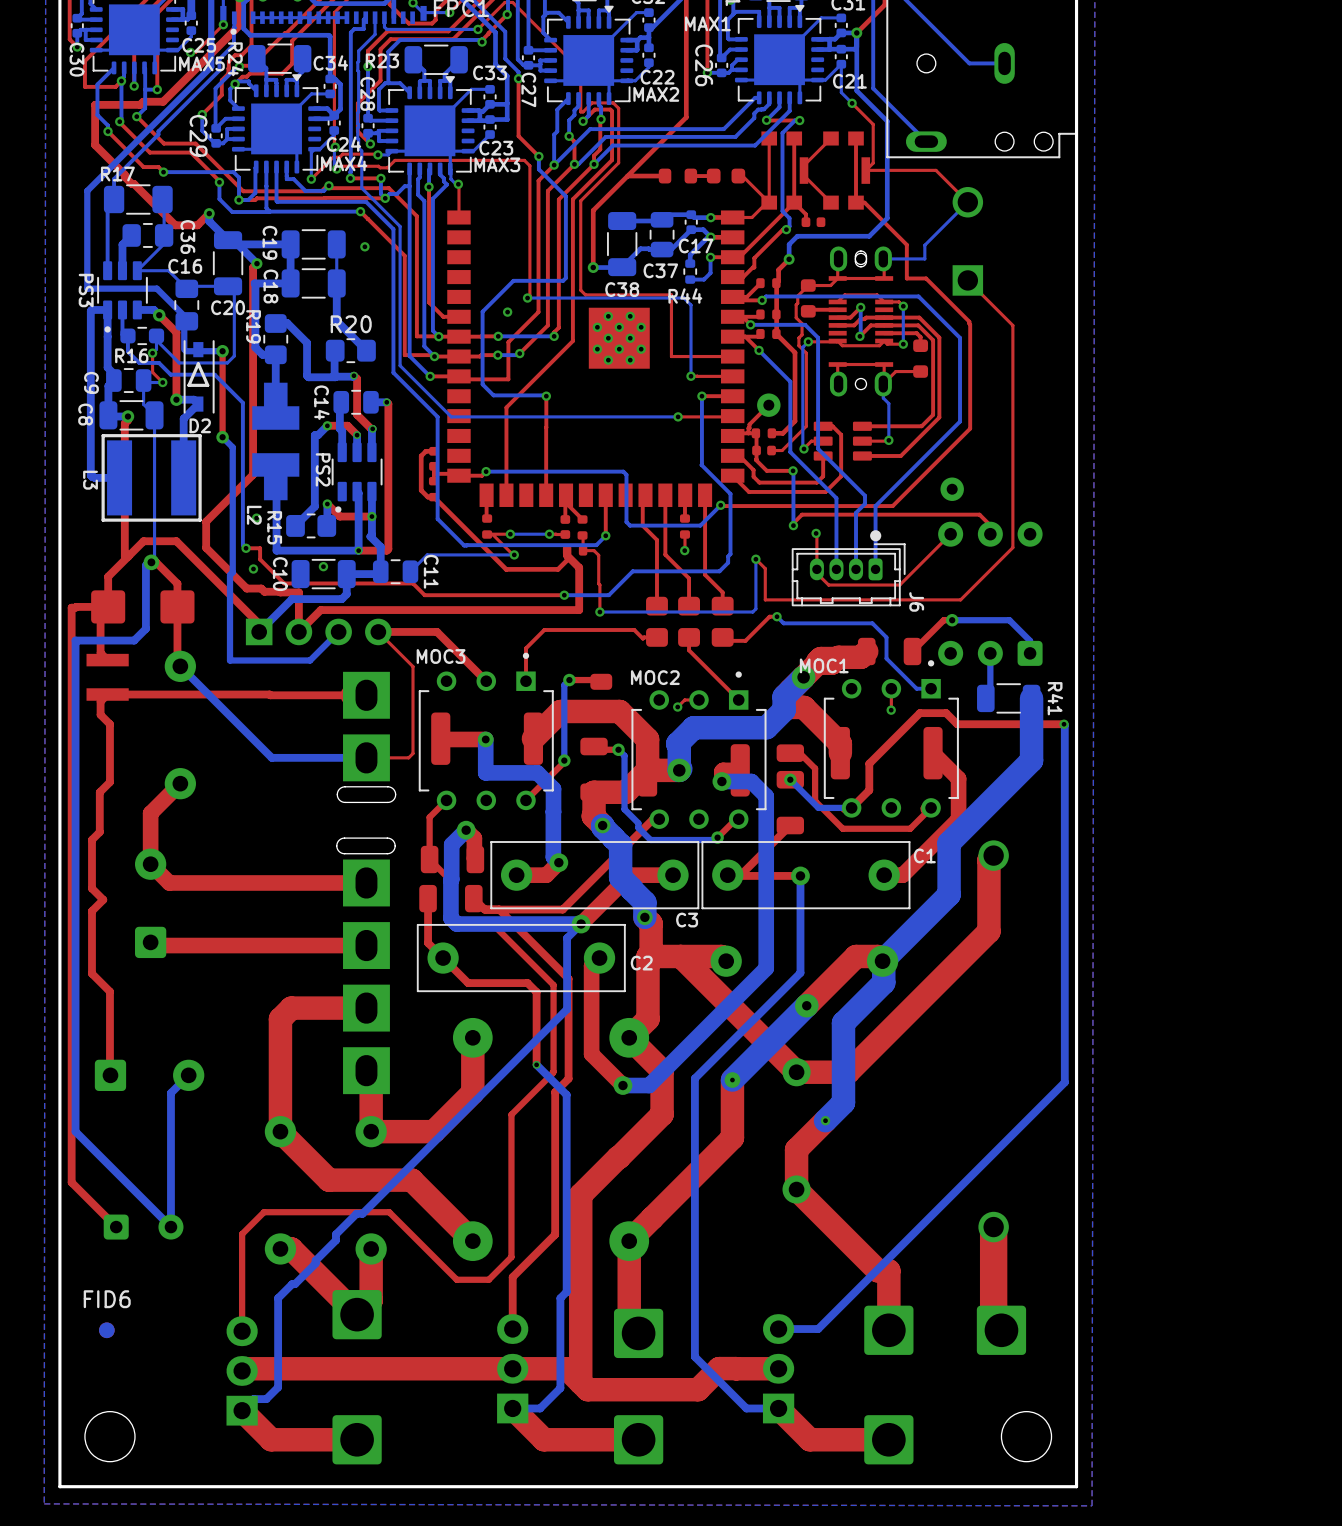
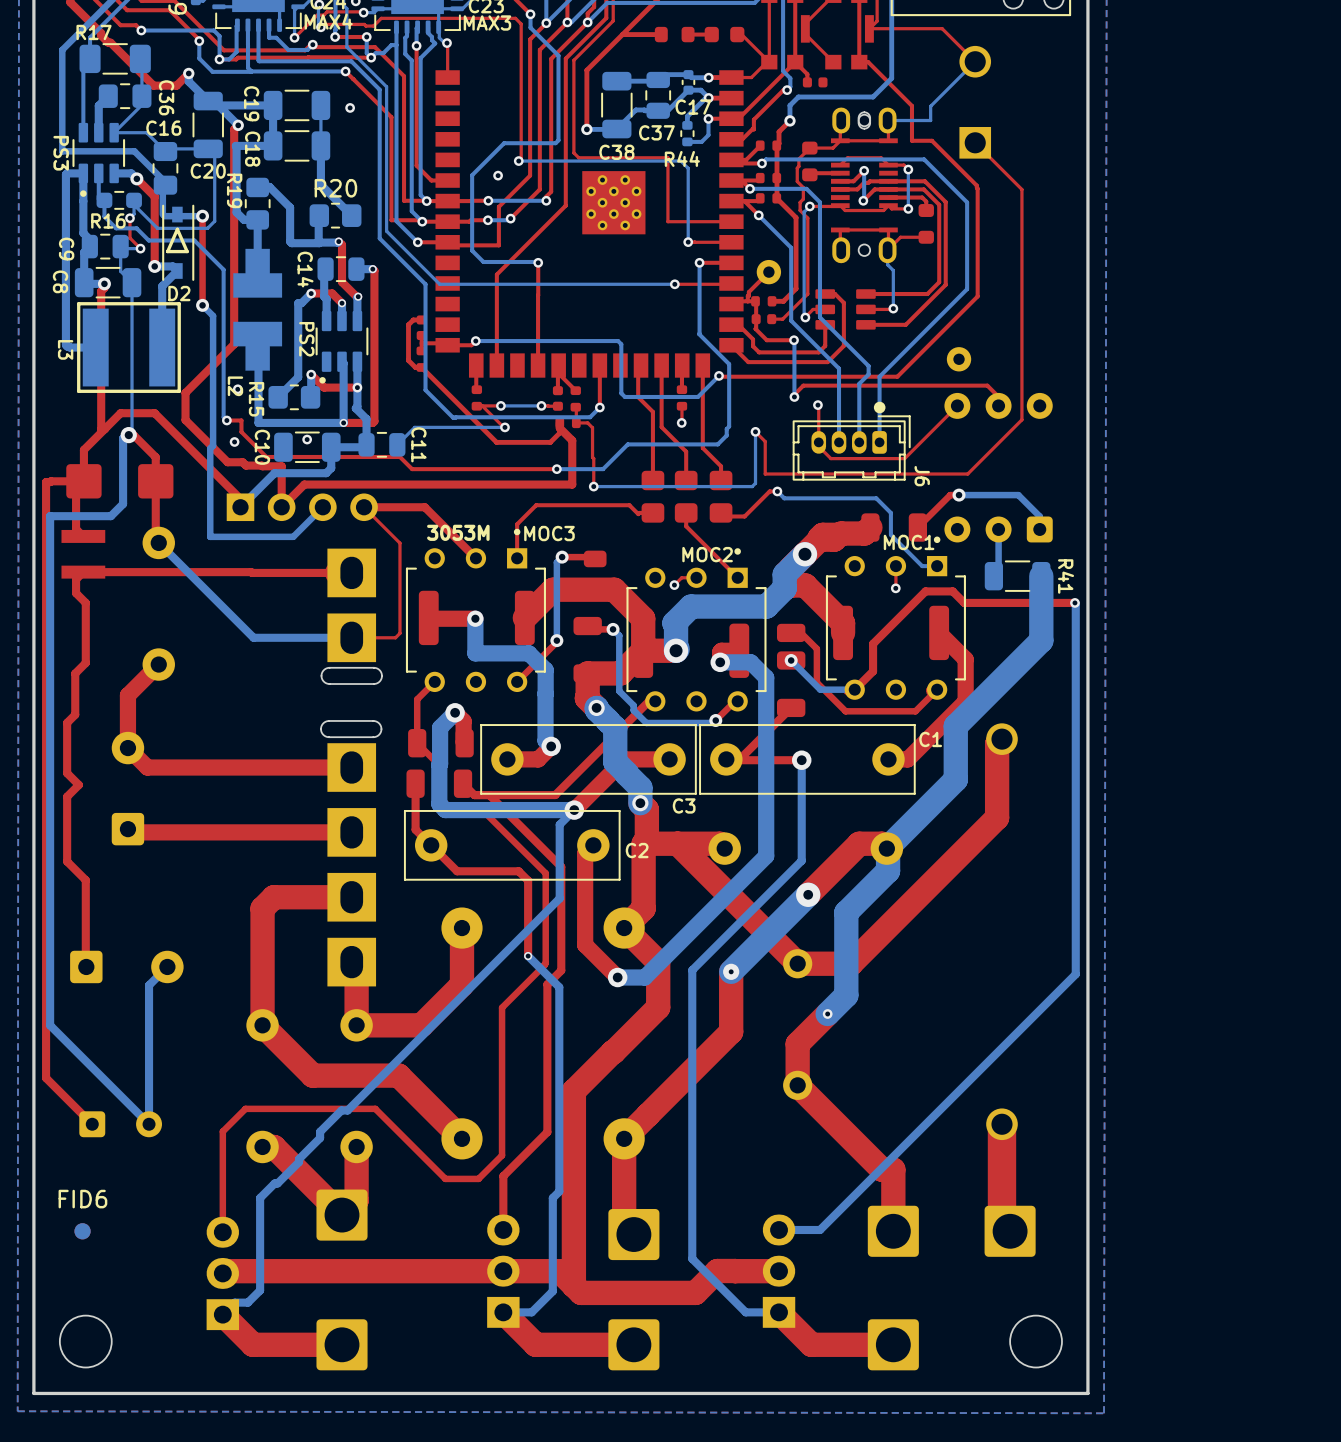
MOC3 name position: MOC3 (441, 656) -> MOC3 (549, 533)
text: none -> 3053M (458, 532)
MOC1 name position: MOC1 (824, 665) -> MOC1 (909, 542)
MOC2 name position: MOC2 (655, 677) -> MOC2 (707, 554)

